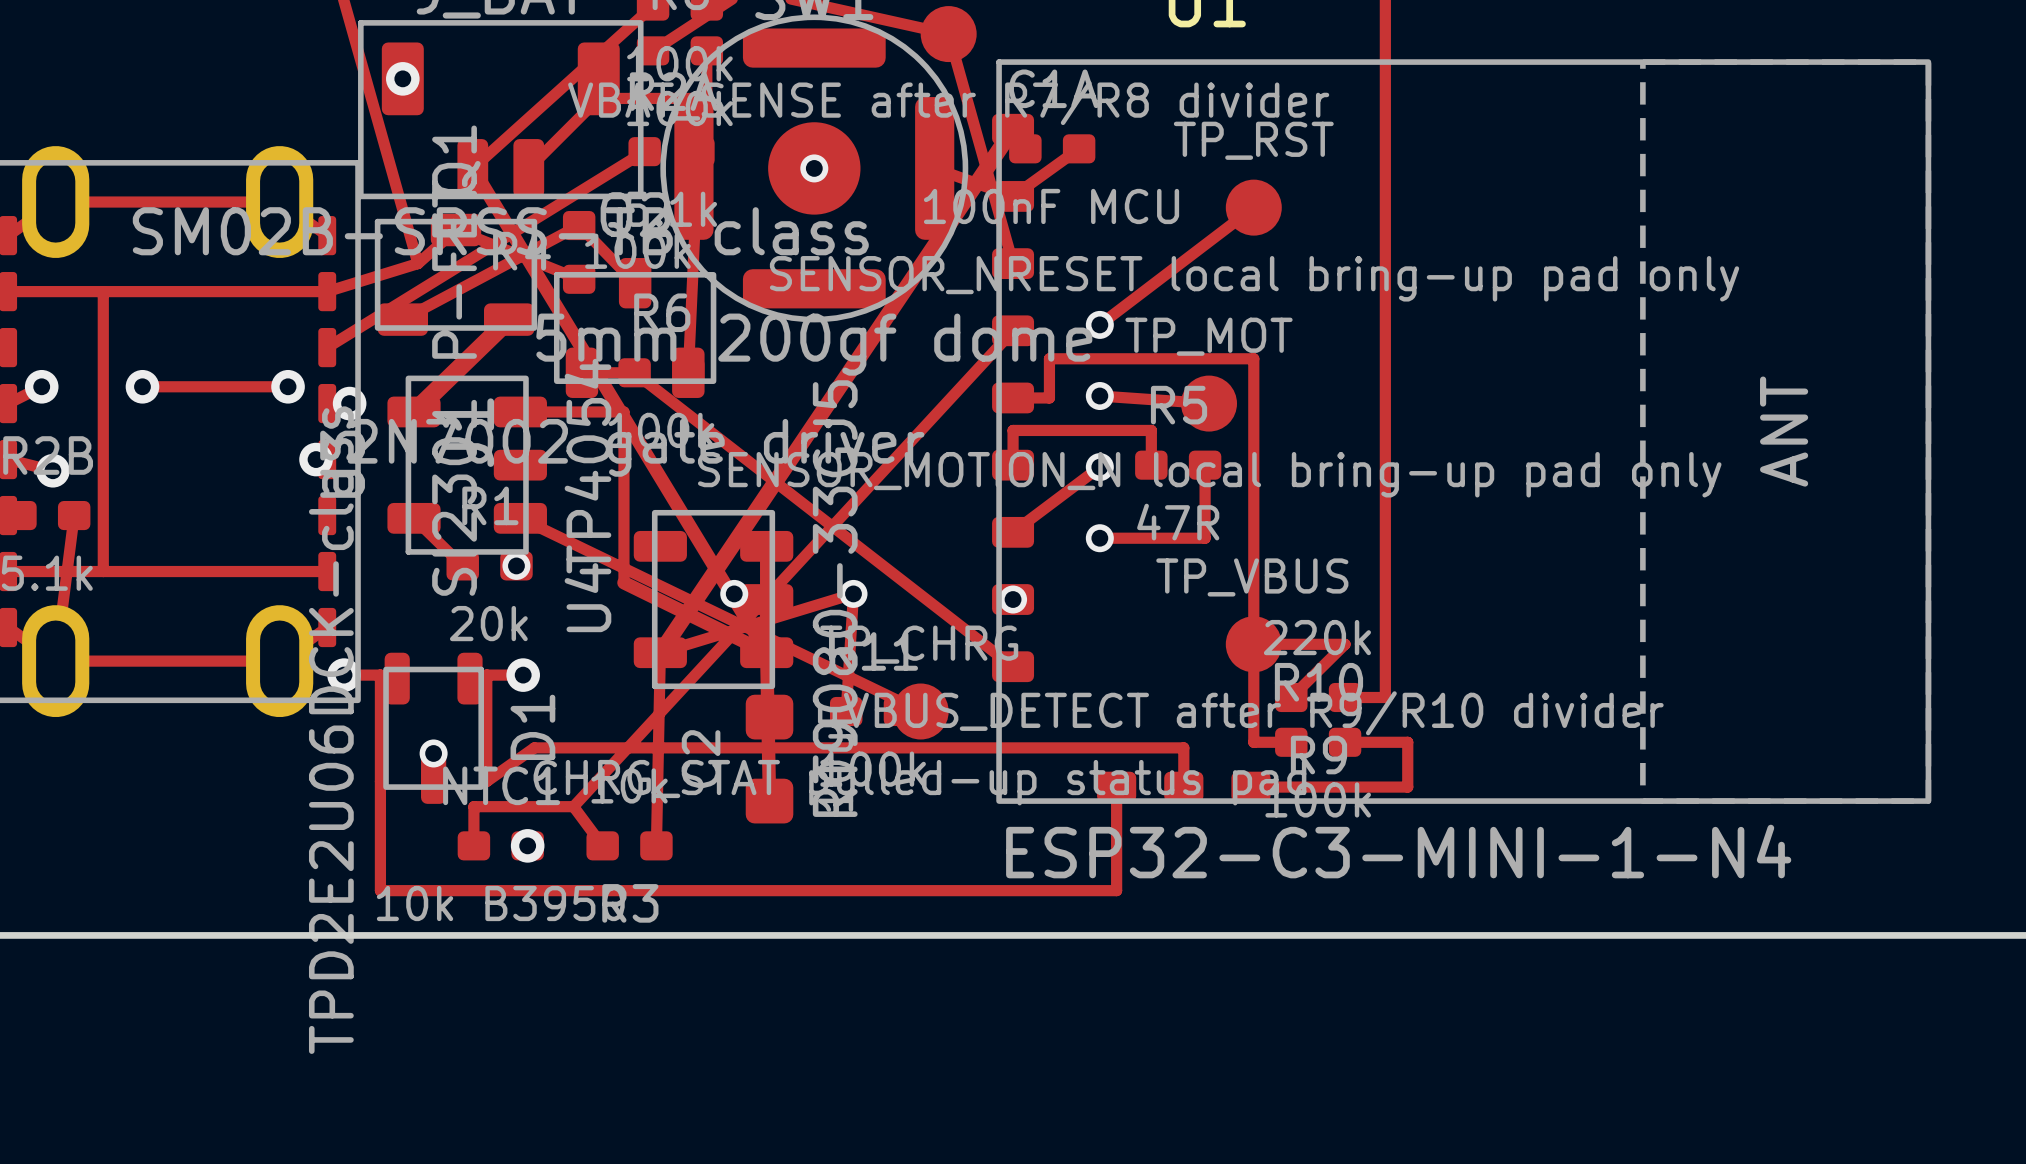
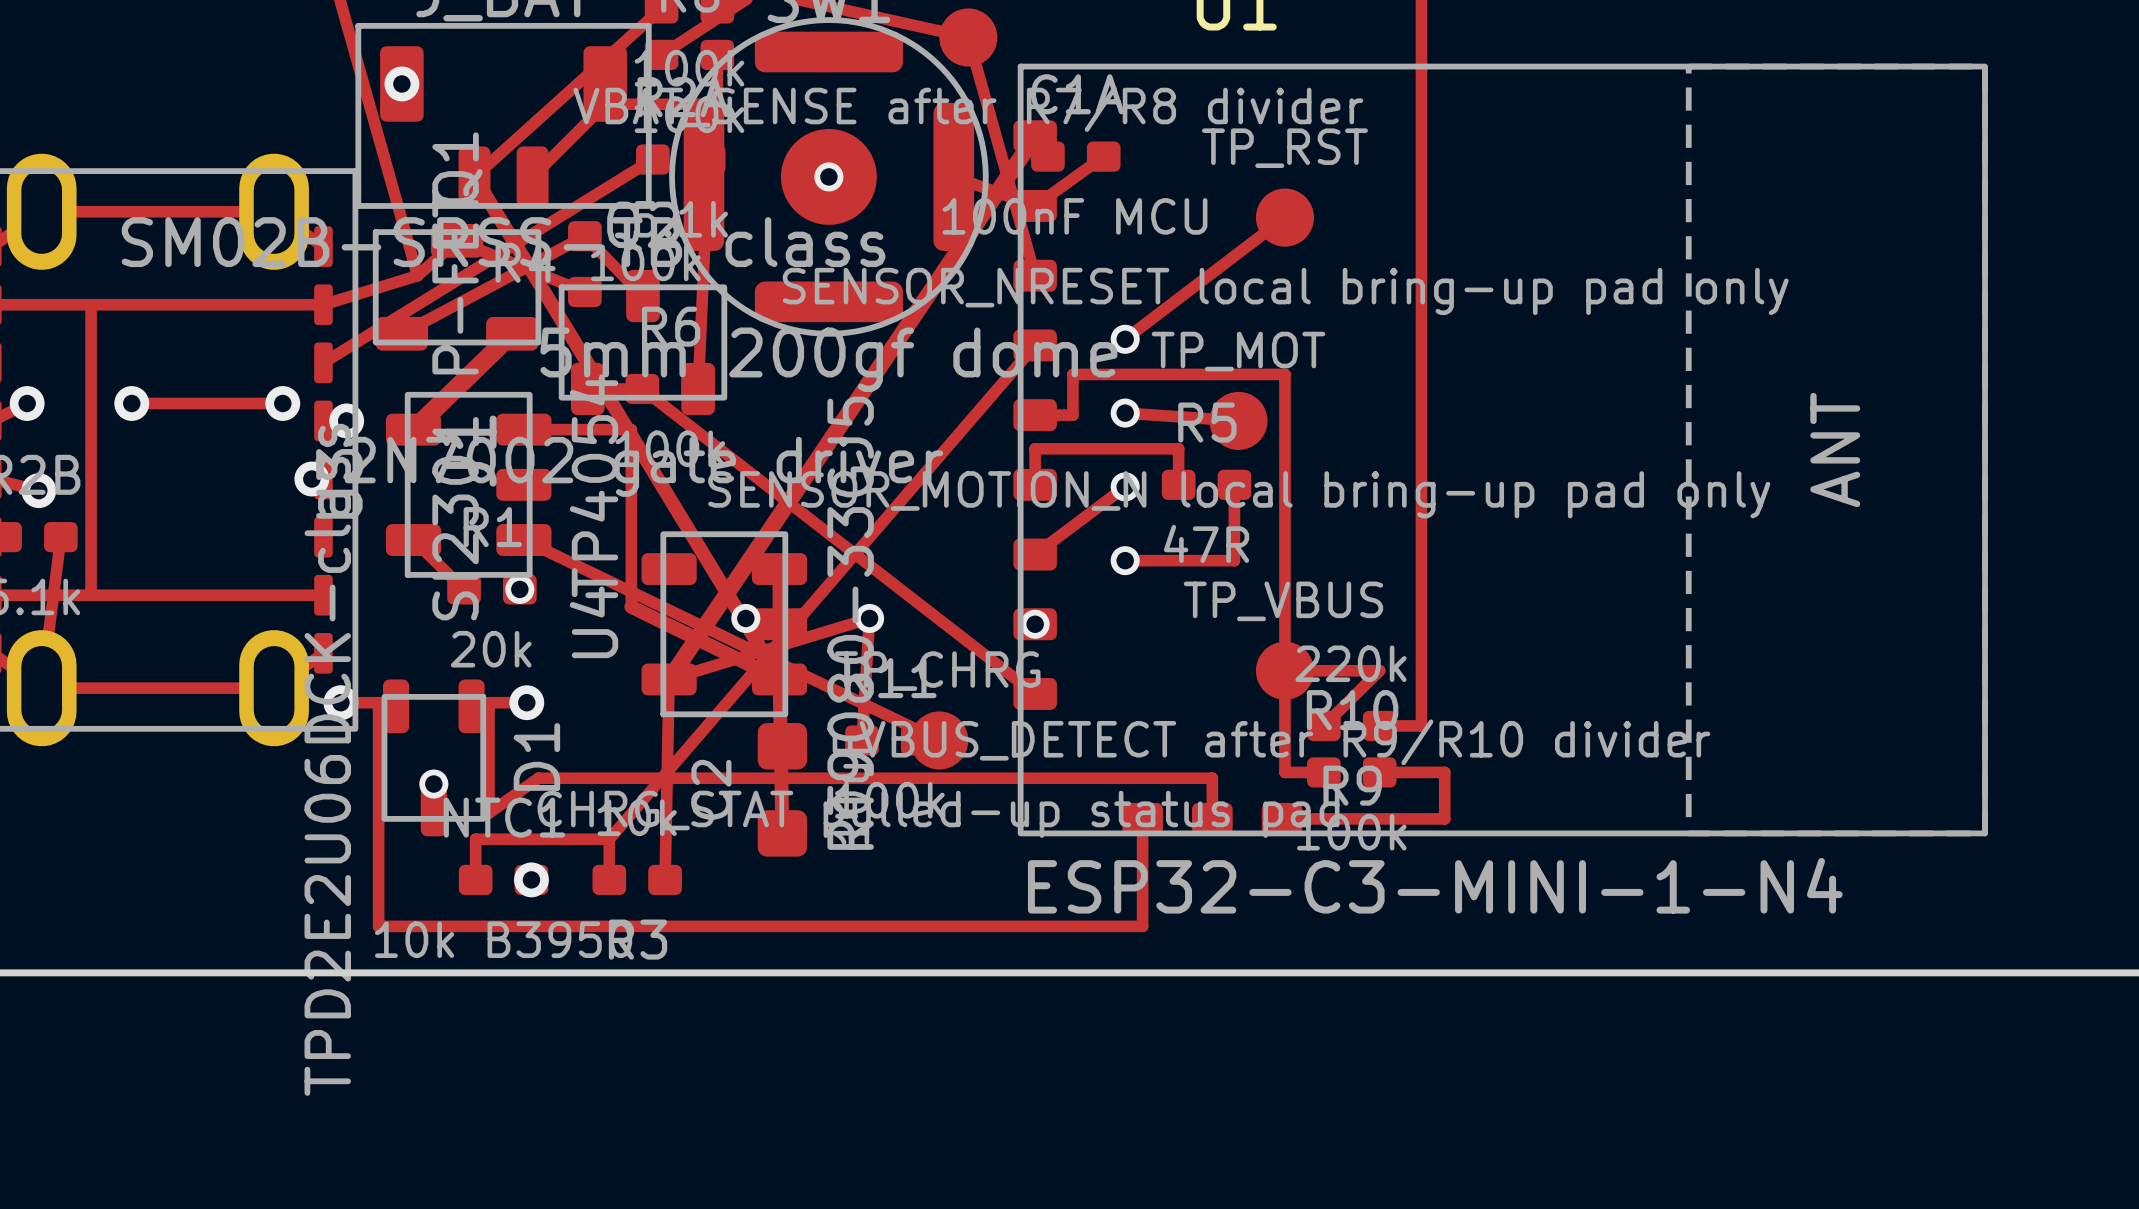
track: (1013, 330) (573, 806) (602, 845) -> (1035, 345) (609, 839)
track: none -> (579, 839) (609, 839)
track: none -> (609, 839) (609, 879)

